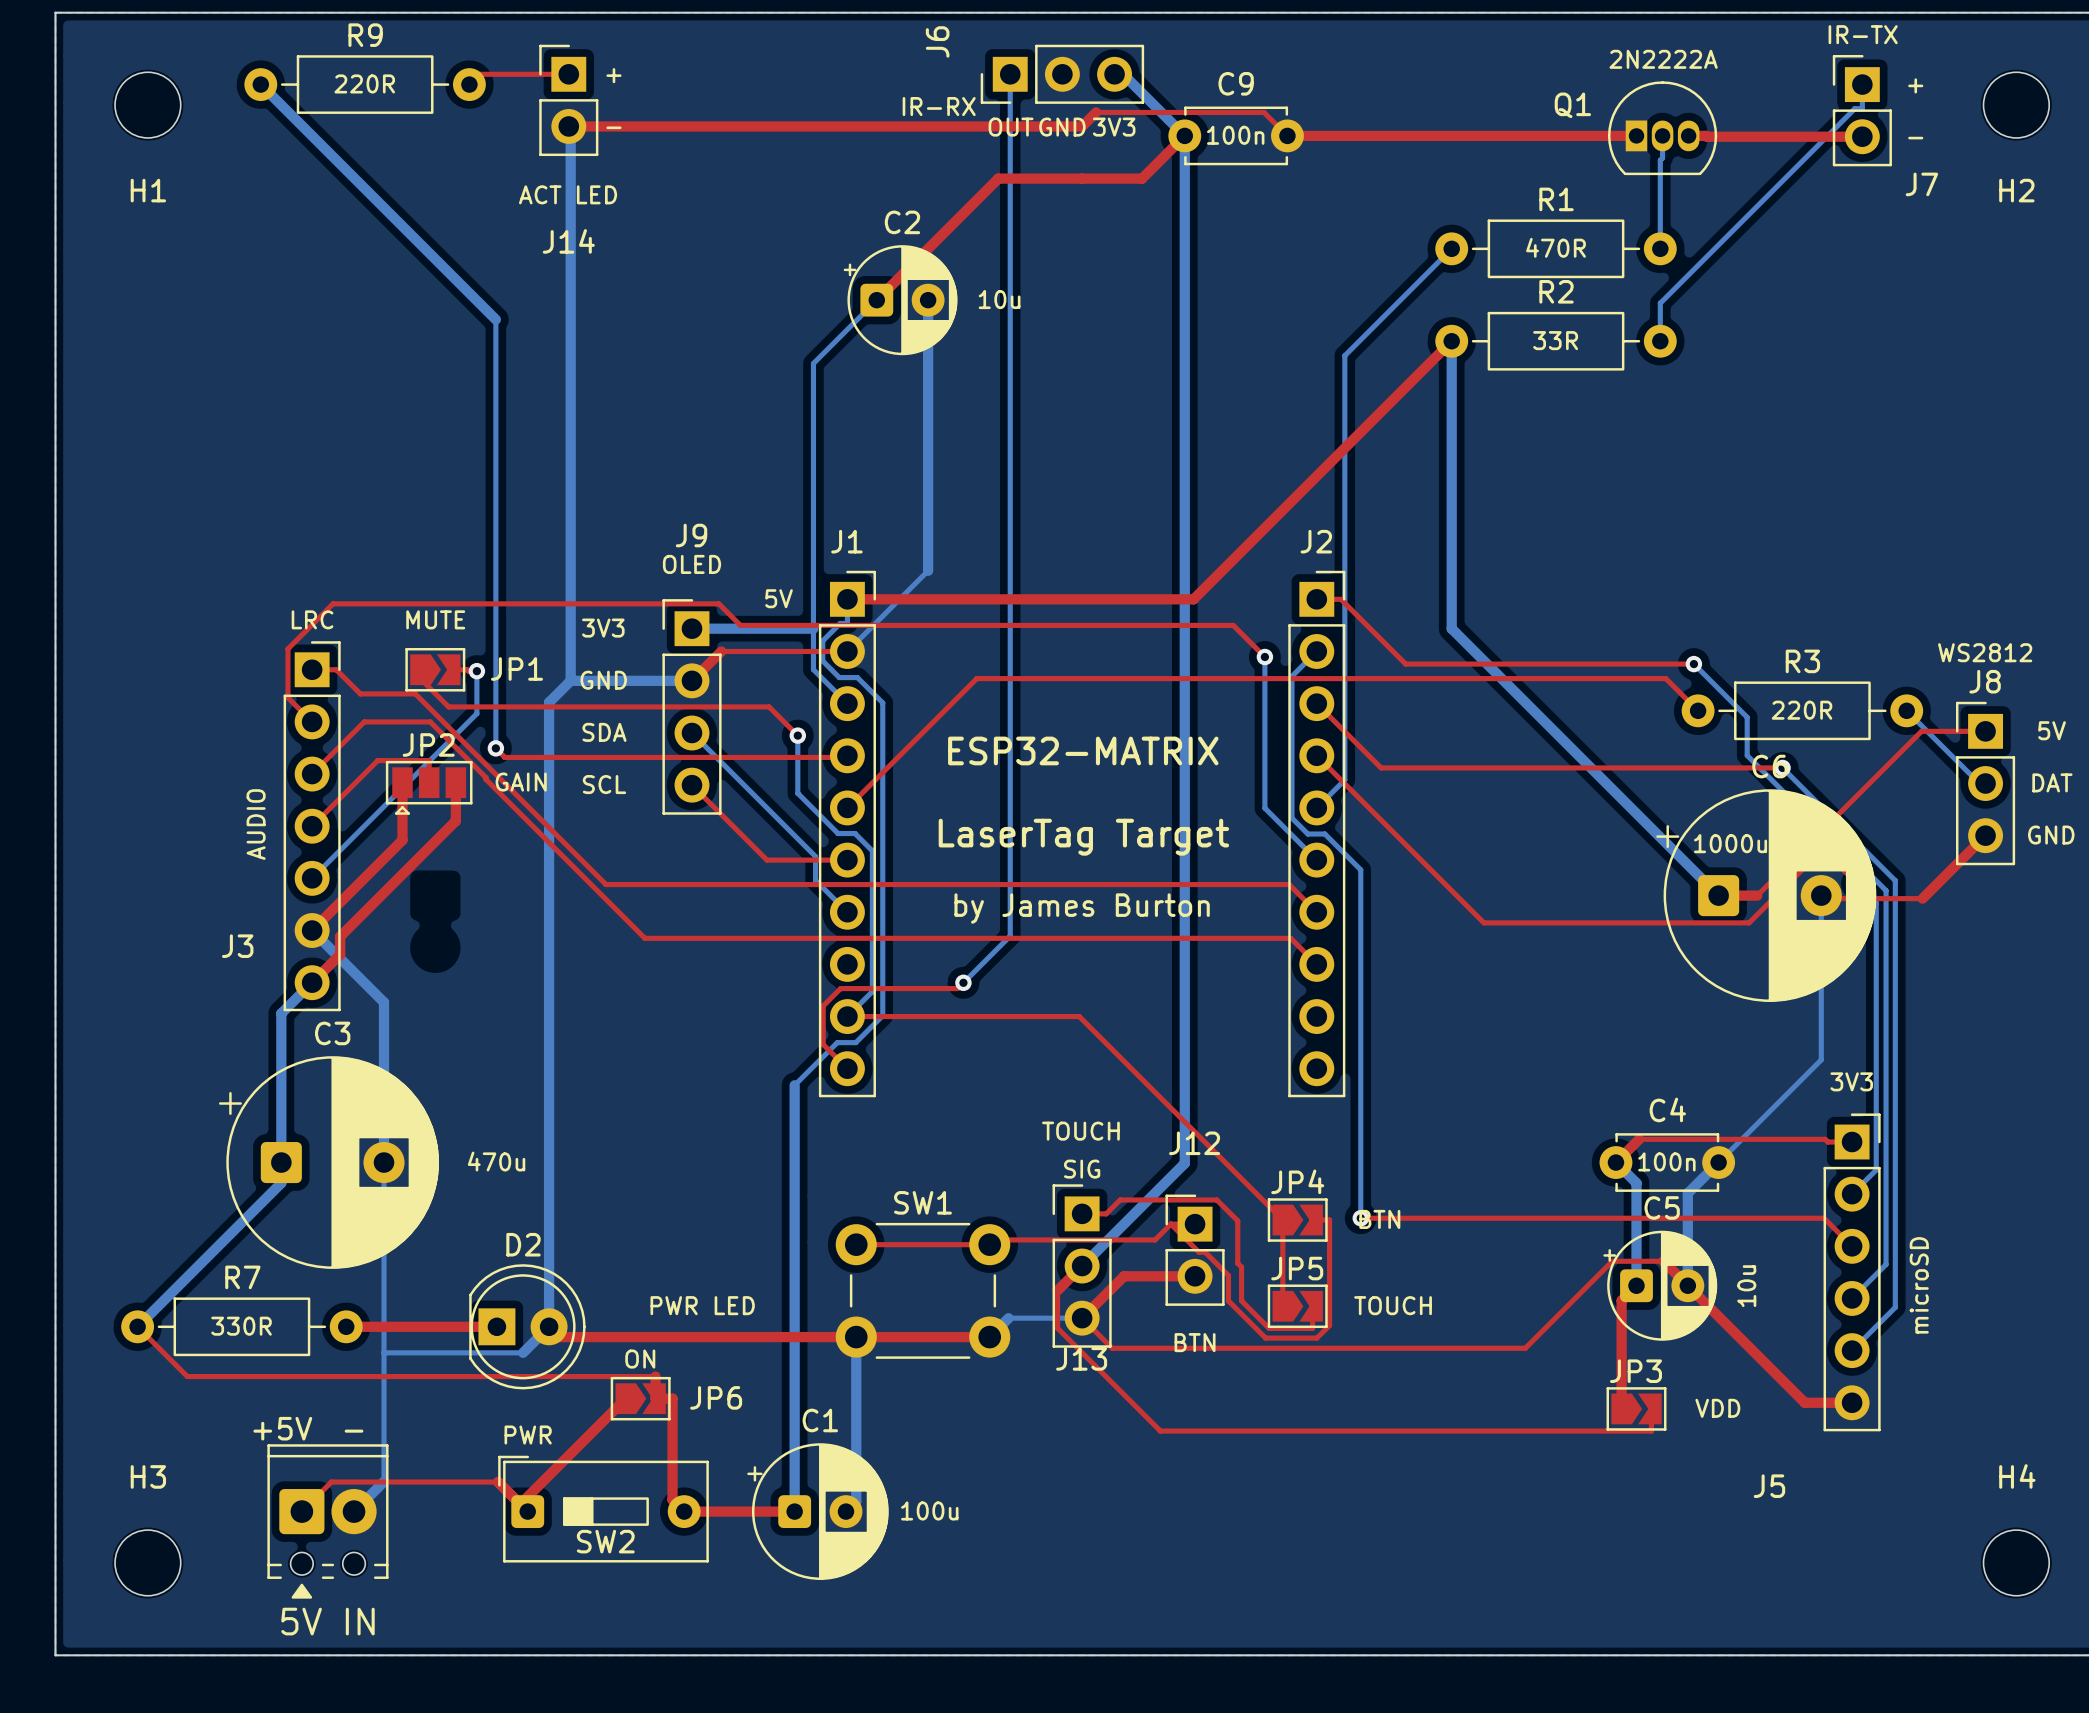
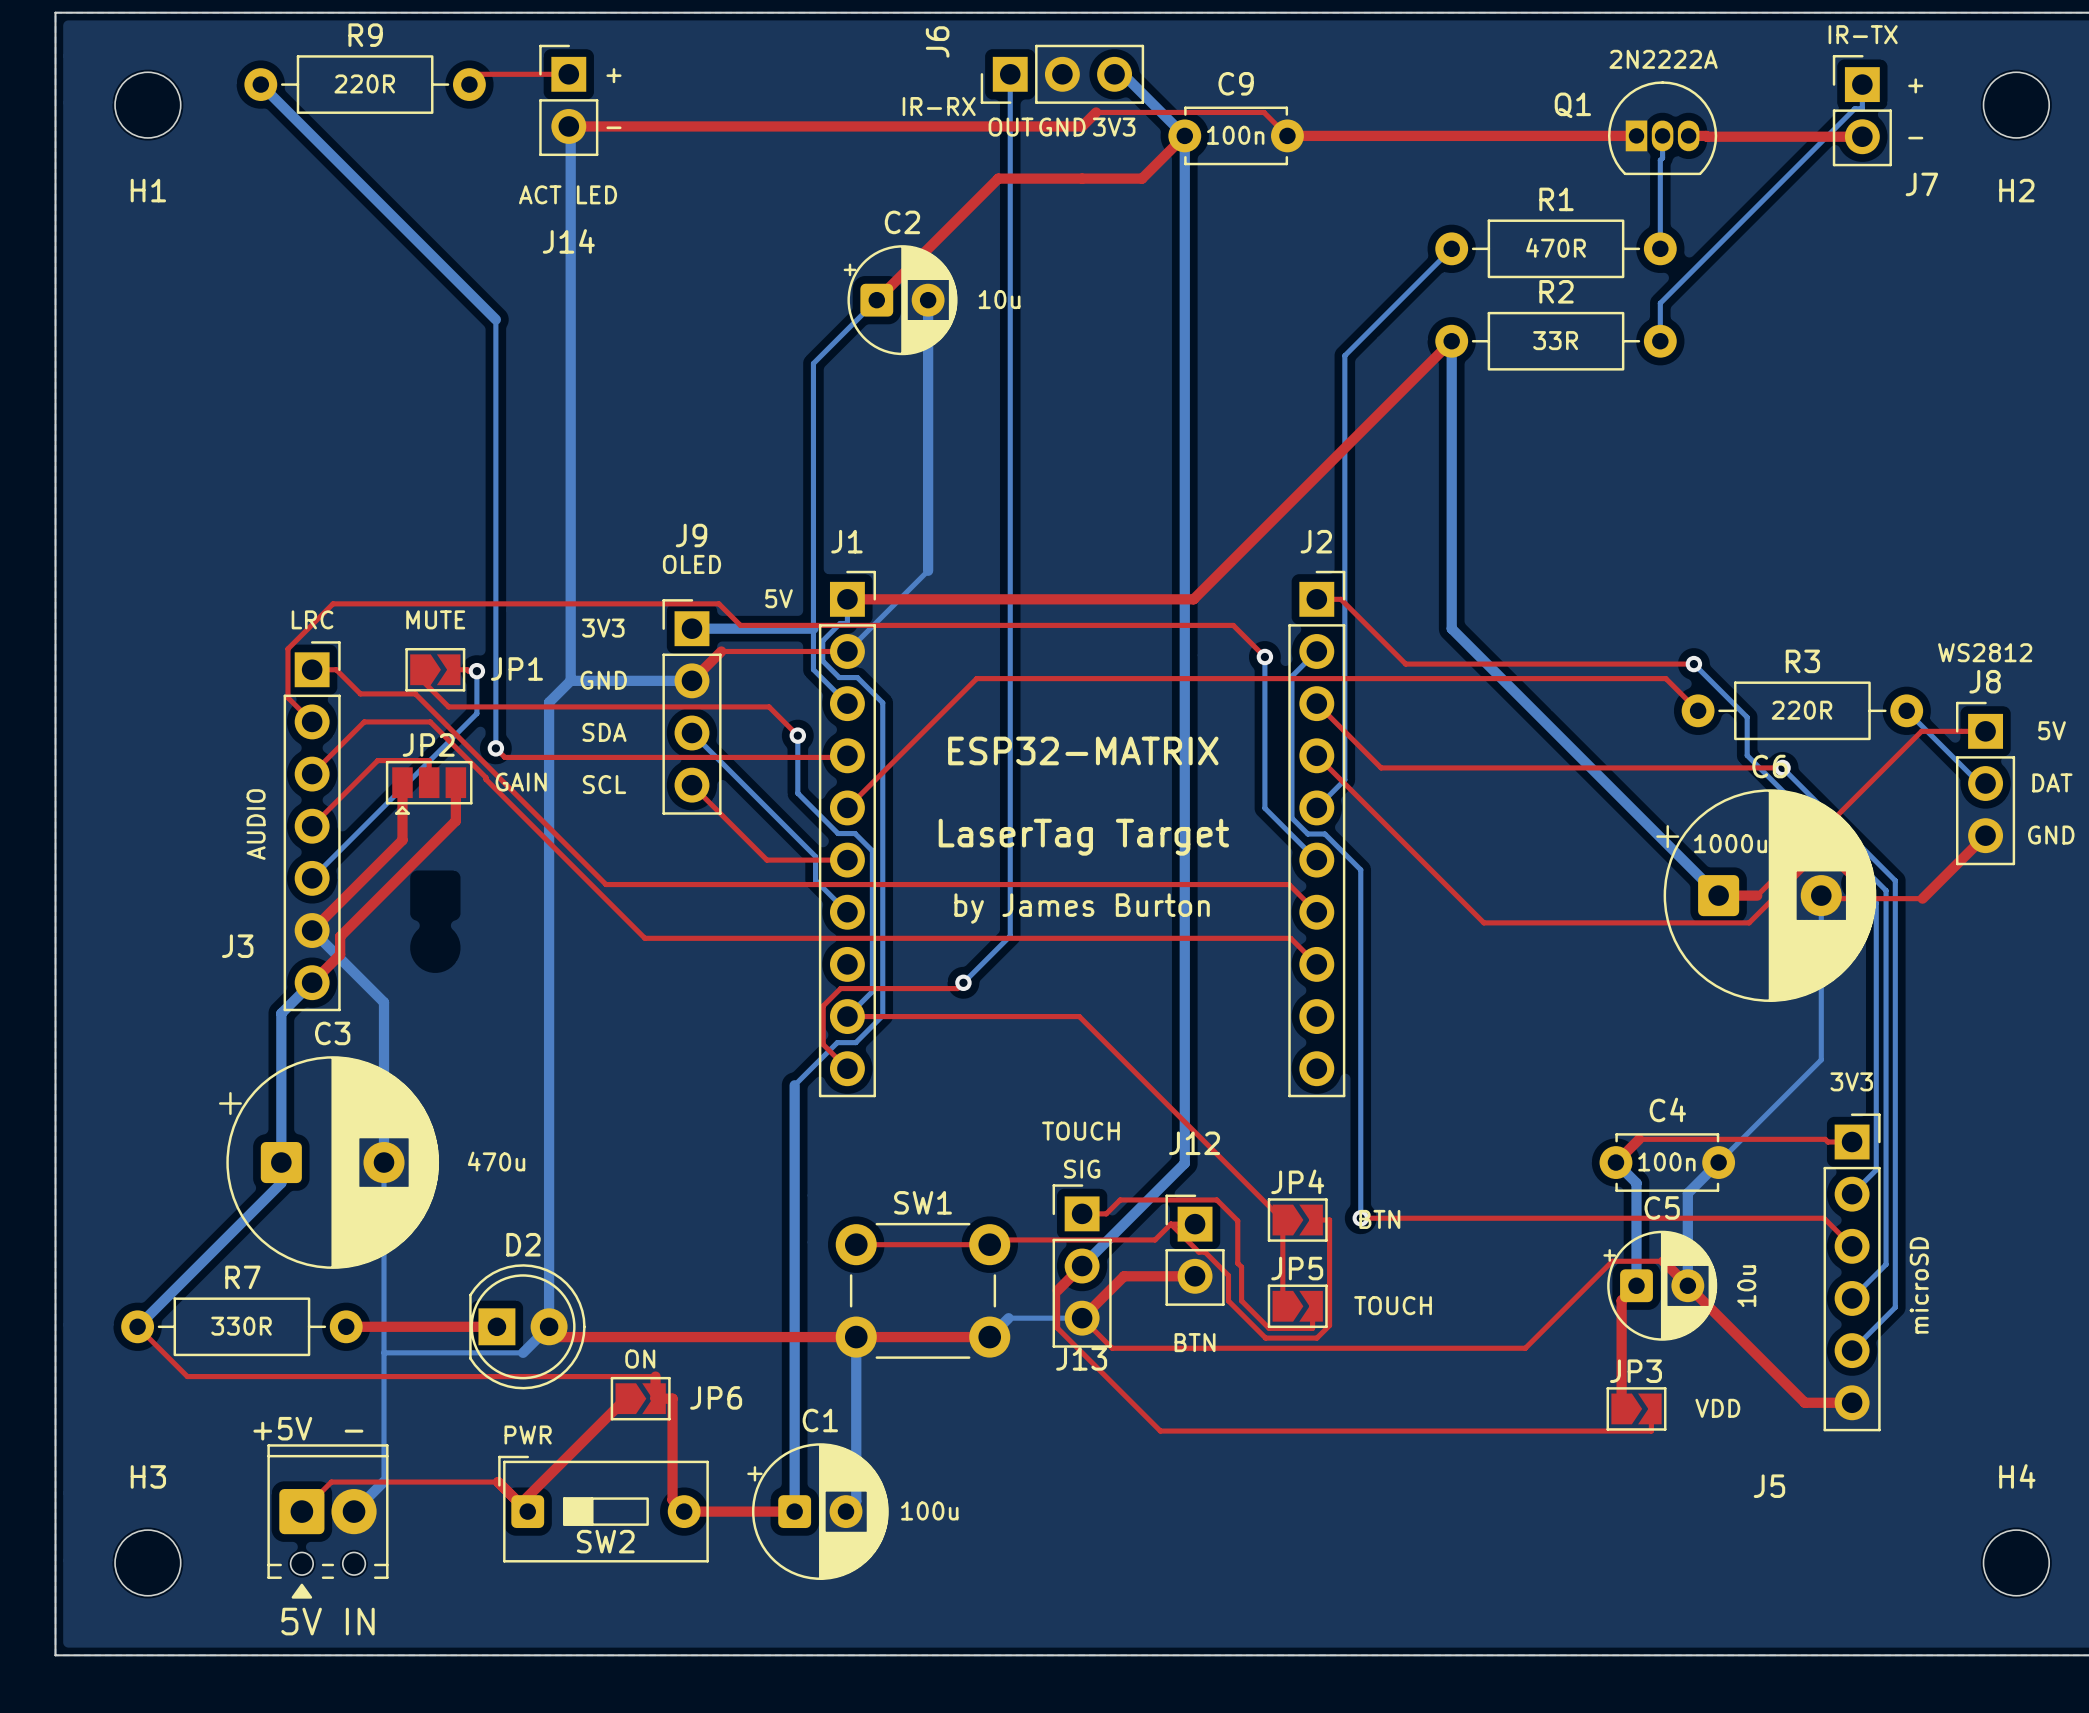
text: PWR LED (702, 1305) -> none

